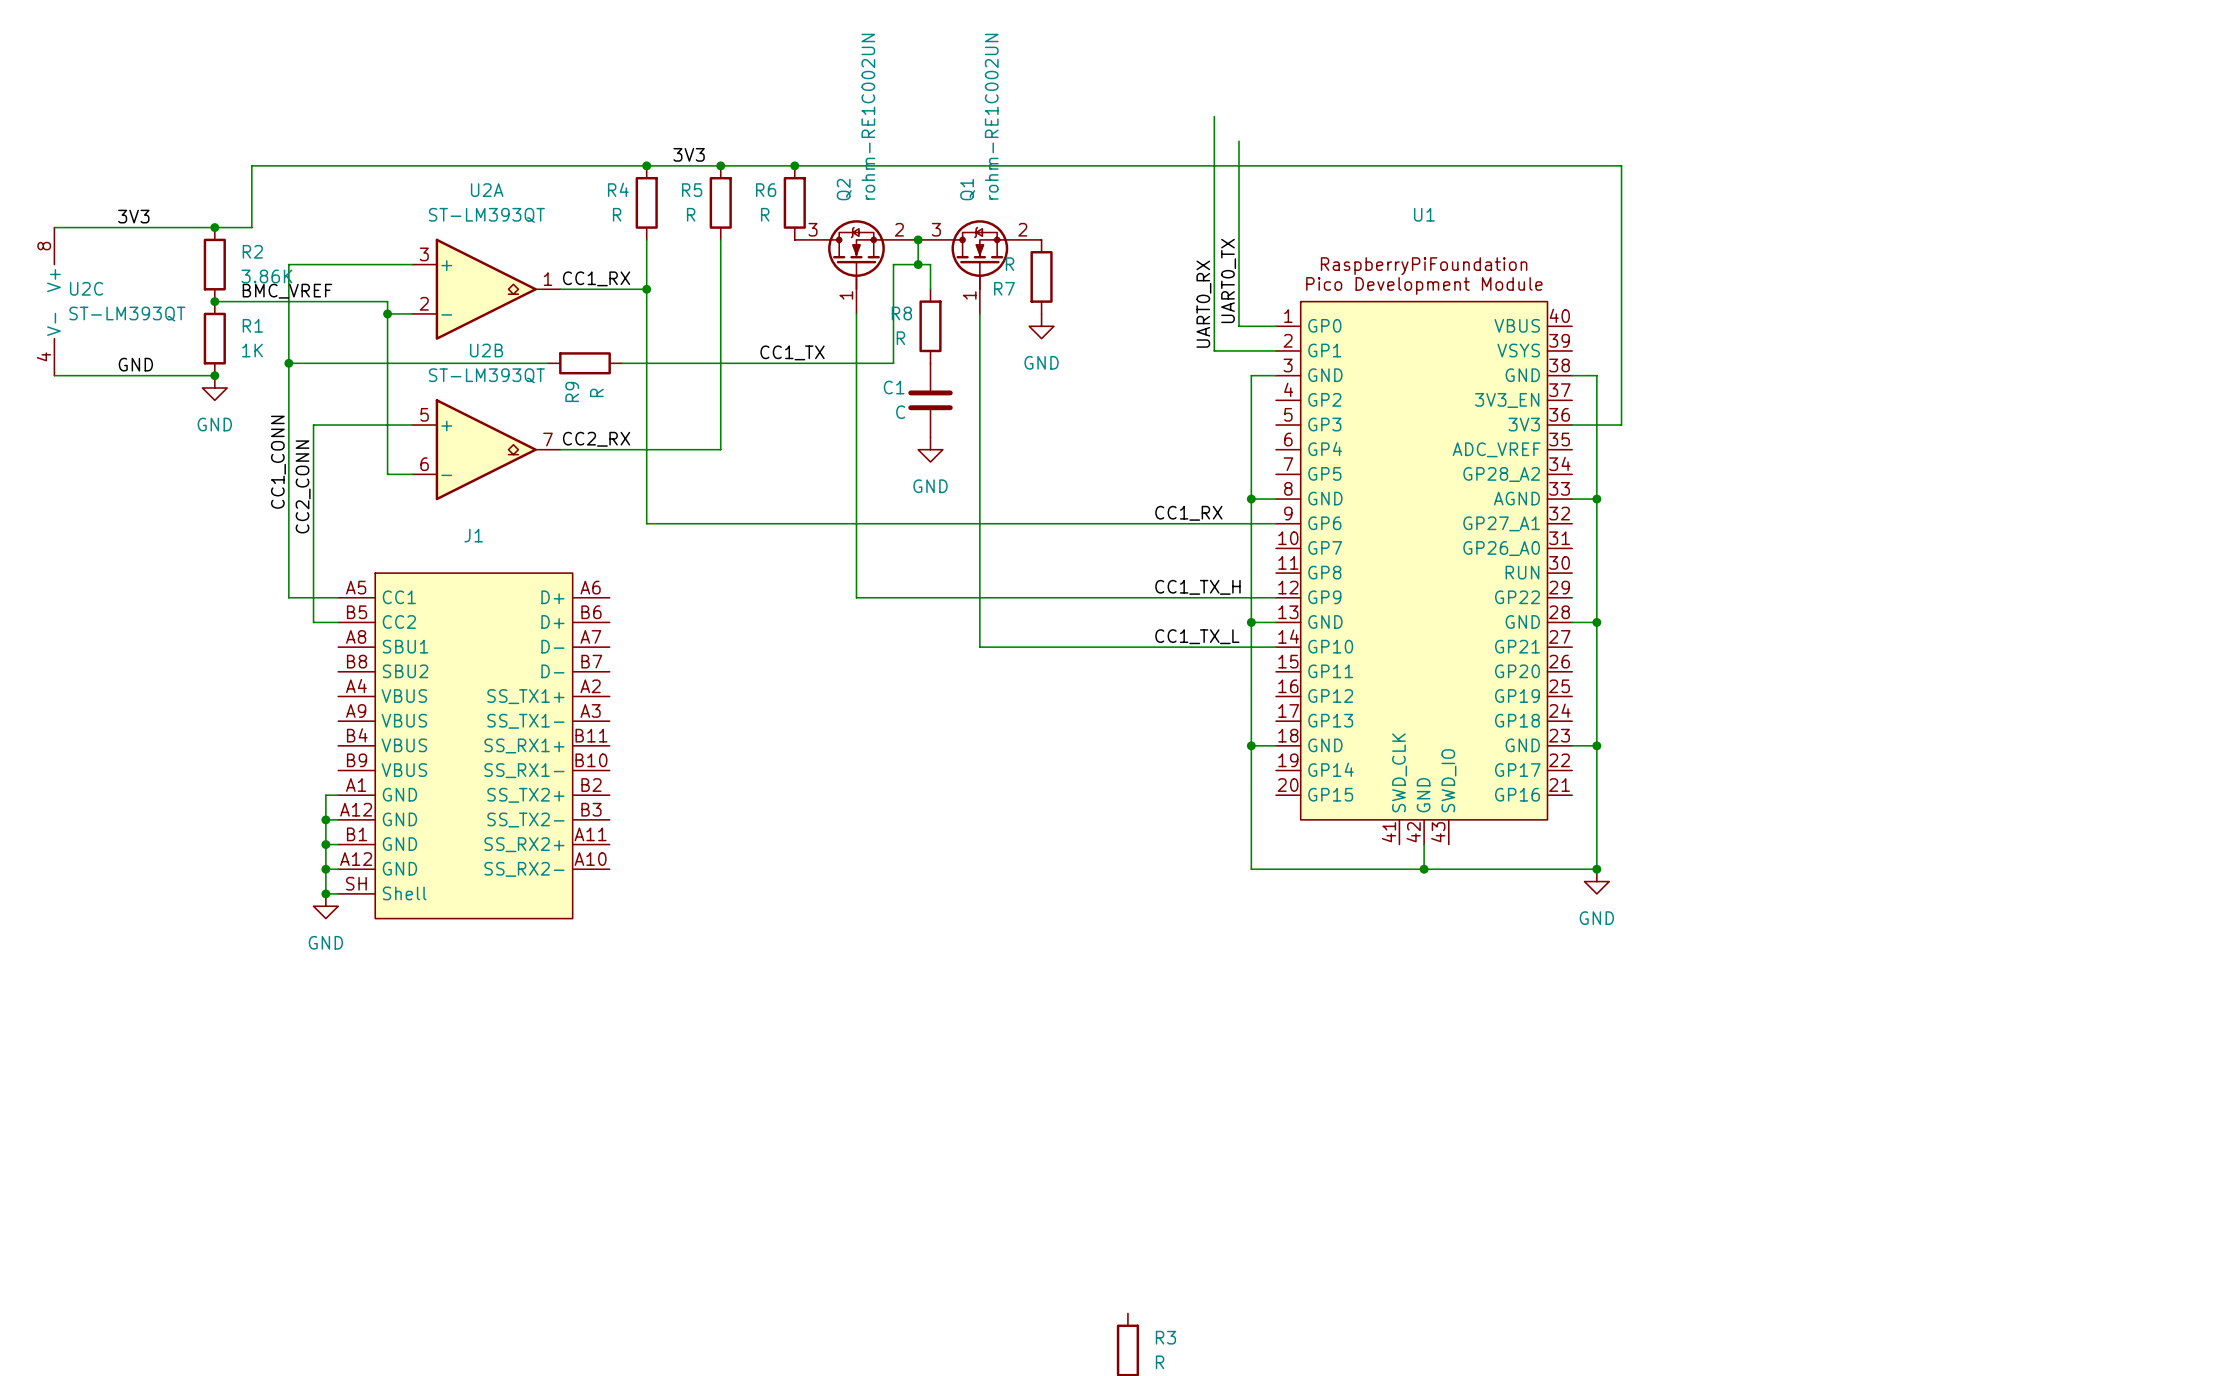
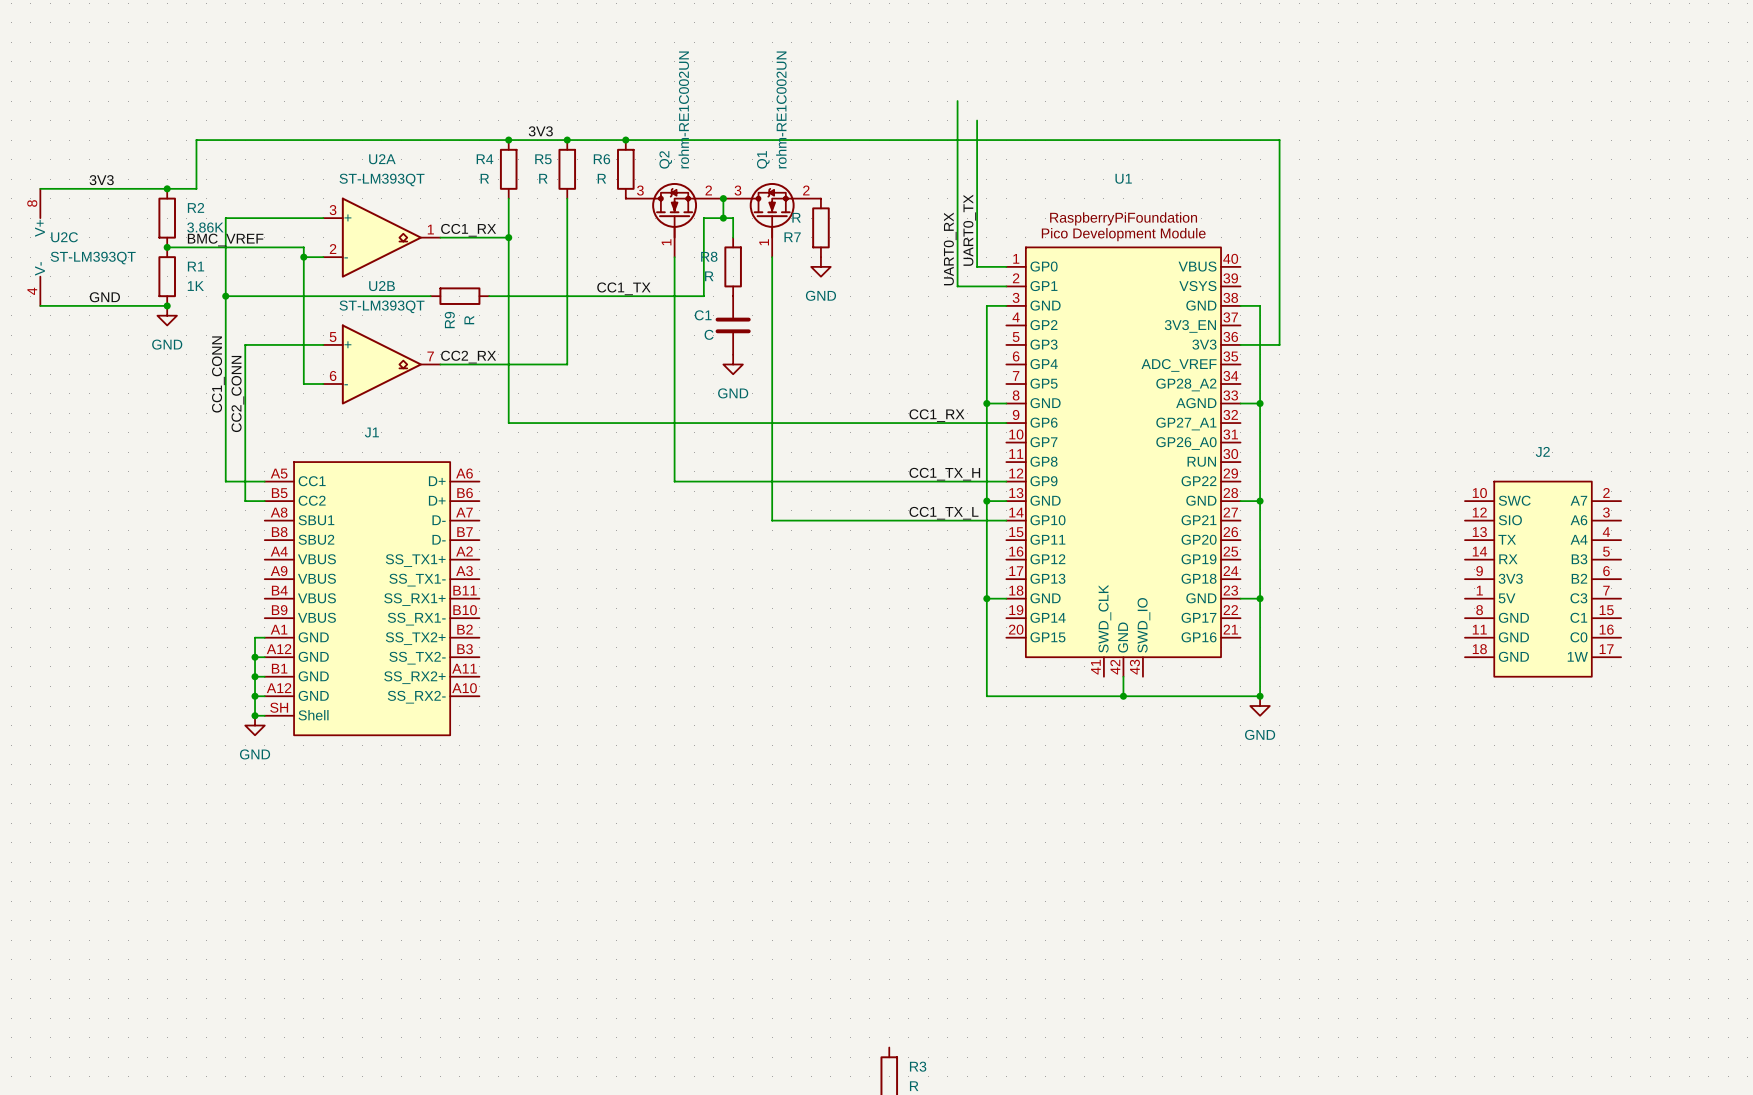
J2: none -> (1543, 579)

